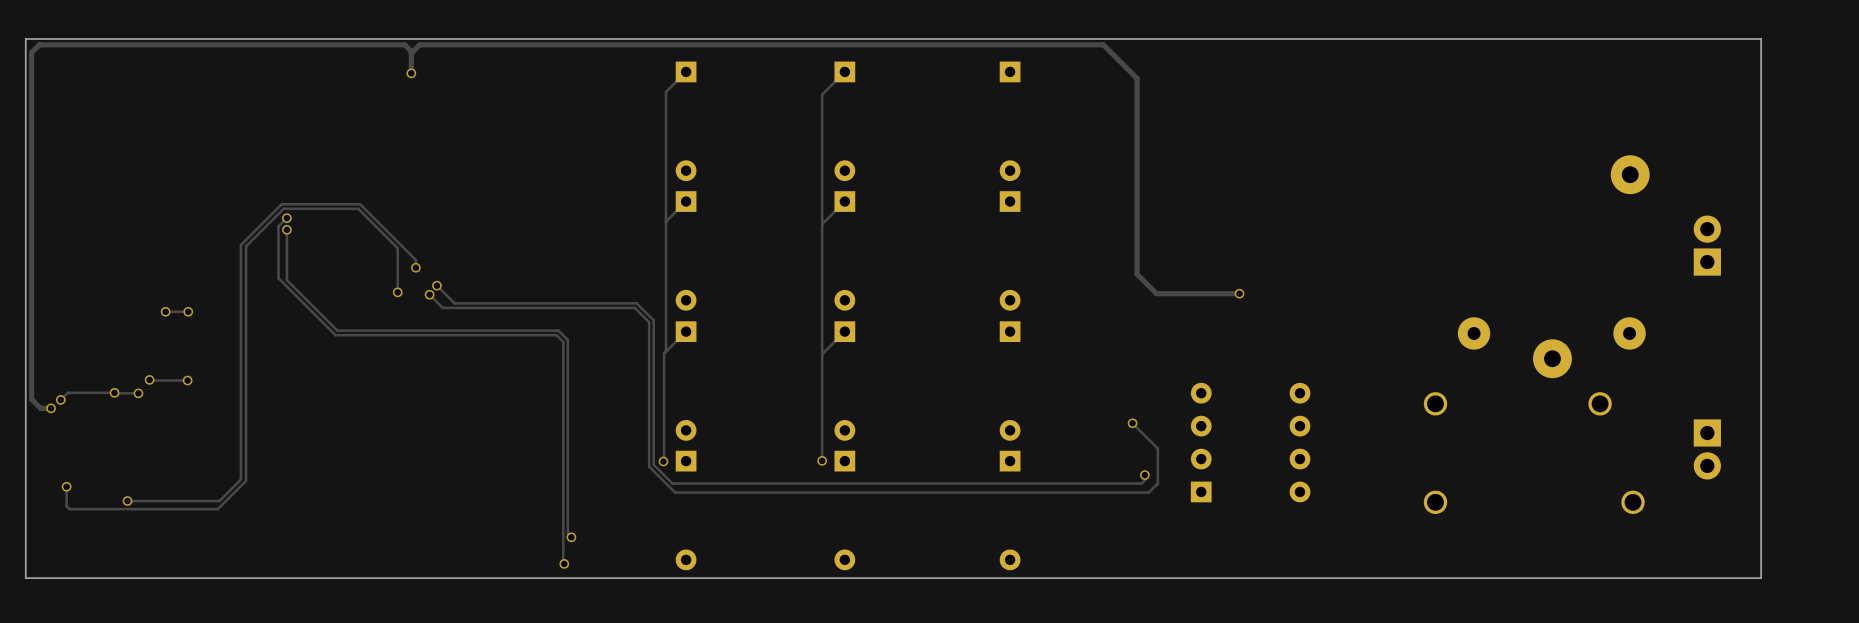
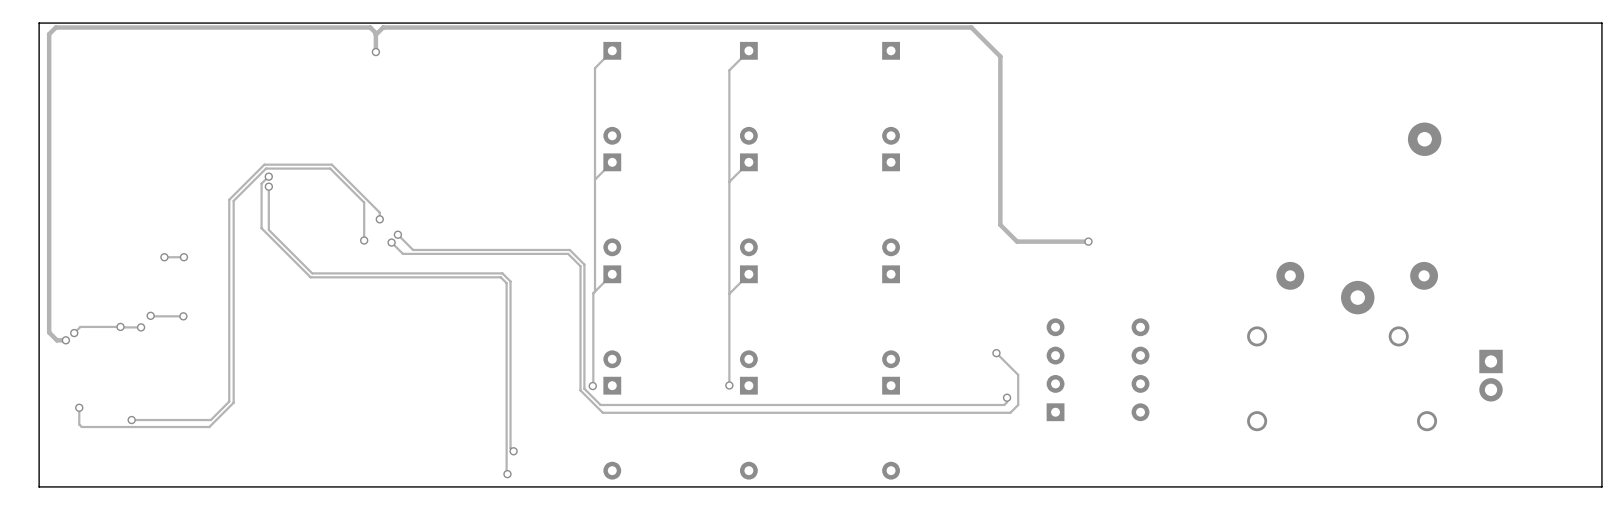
board edge: (1761, 39) (25, 39) (25, 578) (1761, 578) (1761, 39) -> (1601, 23) (1601, 486) (39, 486) (39, 23) (1601, 23)
part: (1707, 245) -> none

